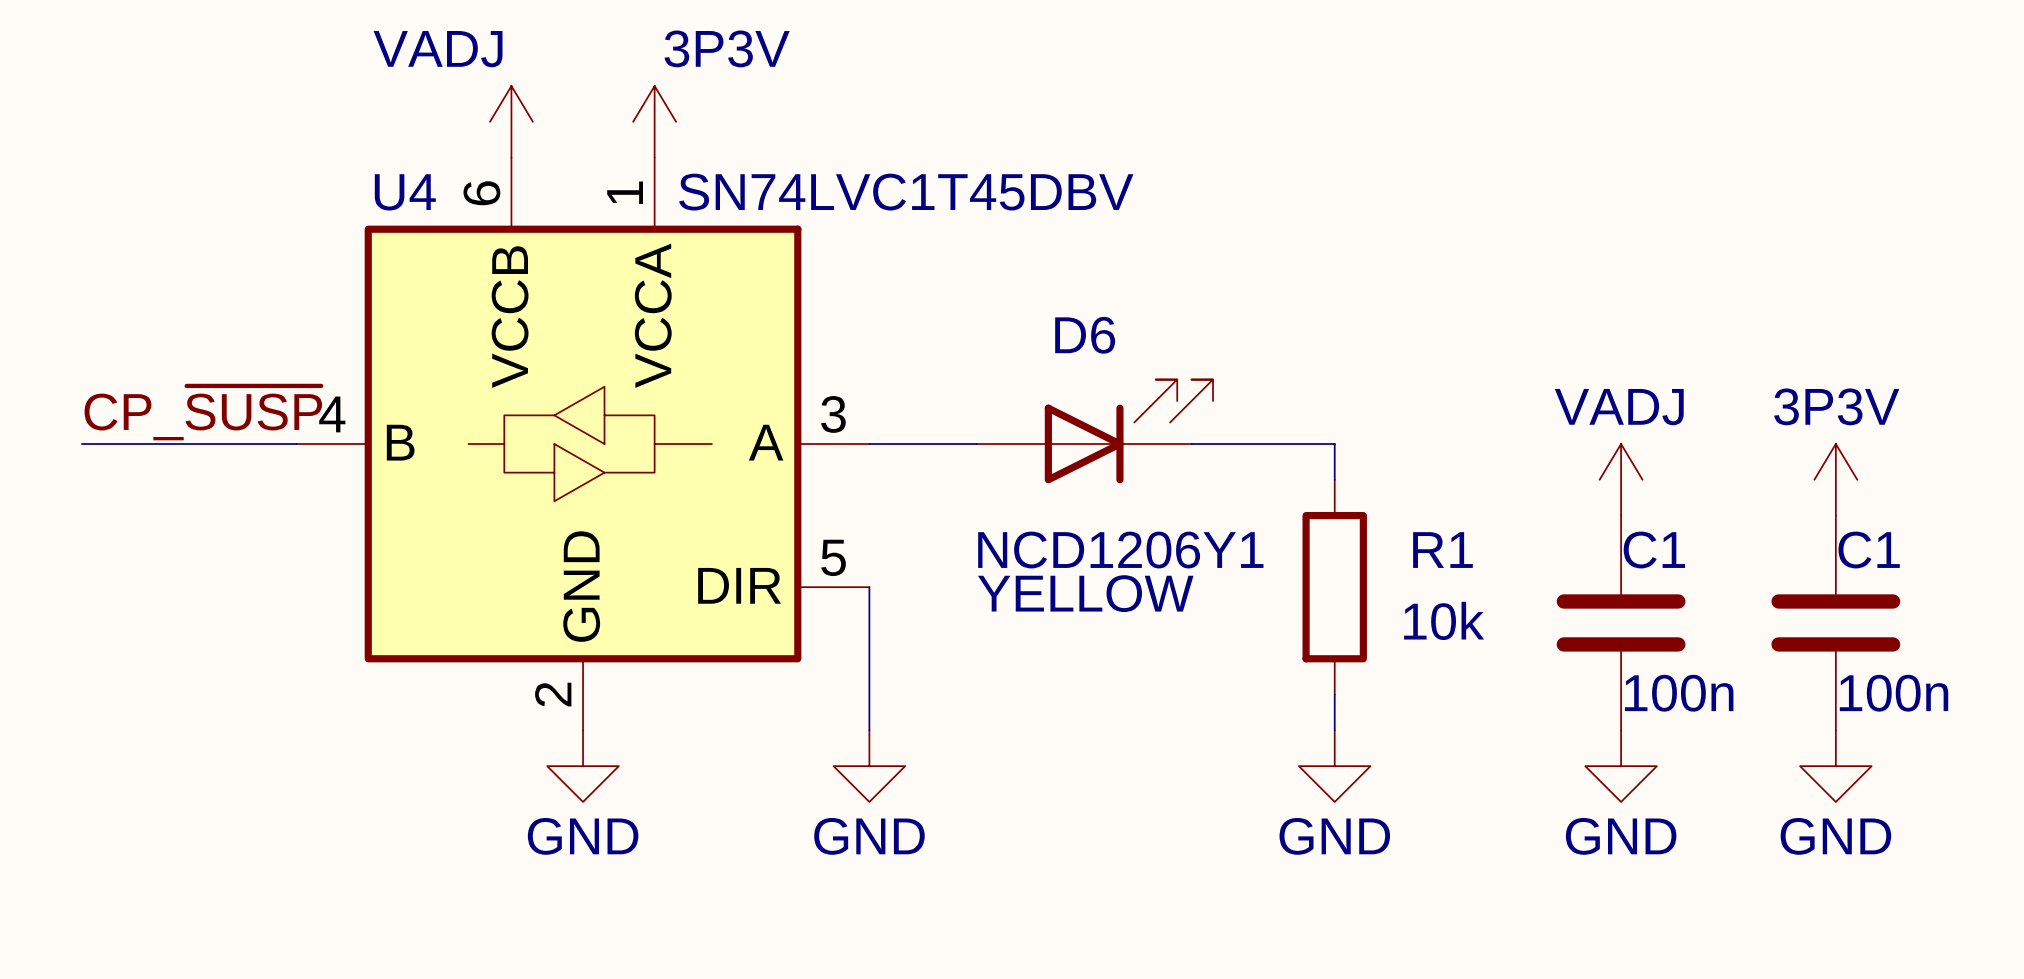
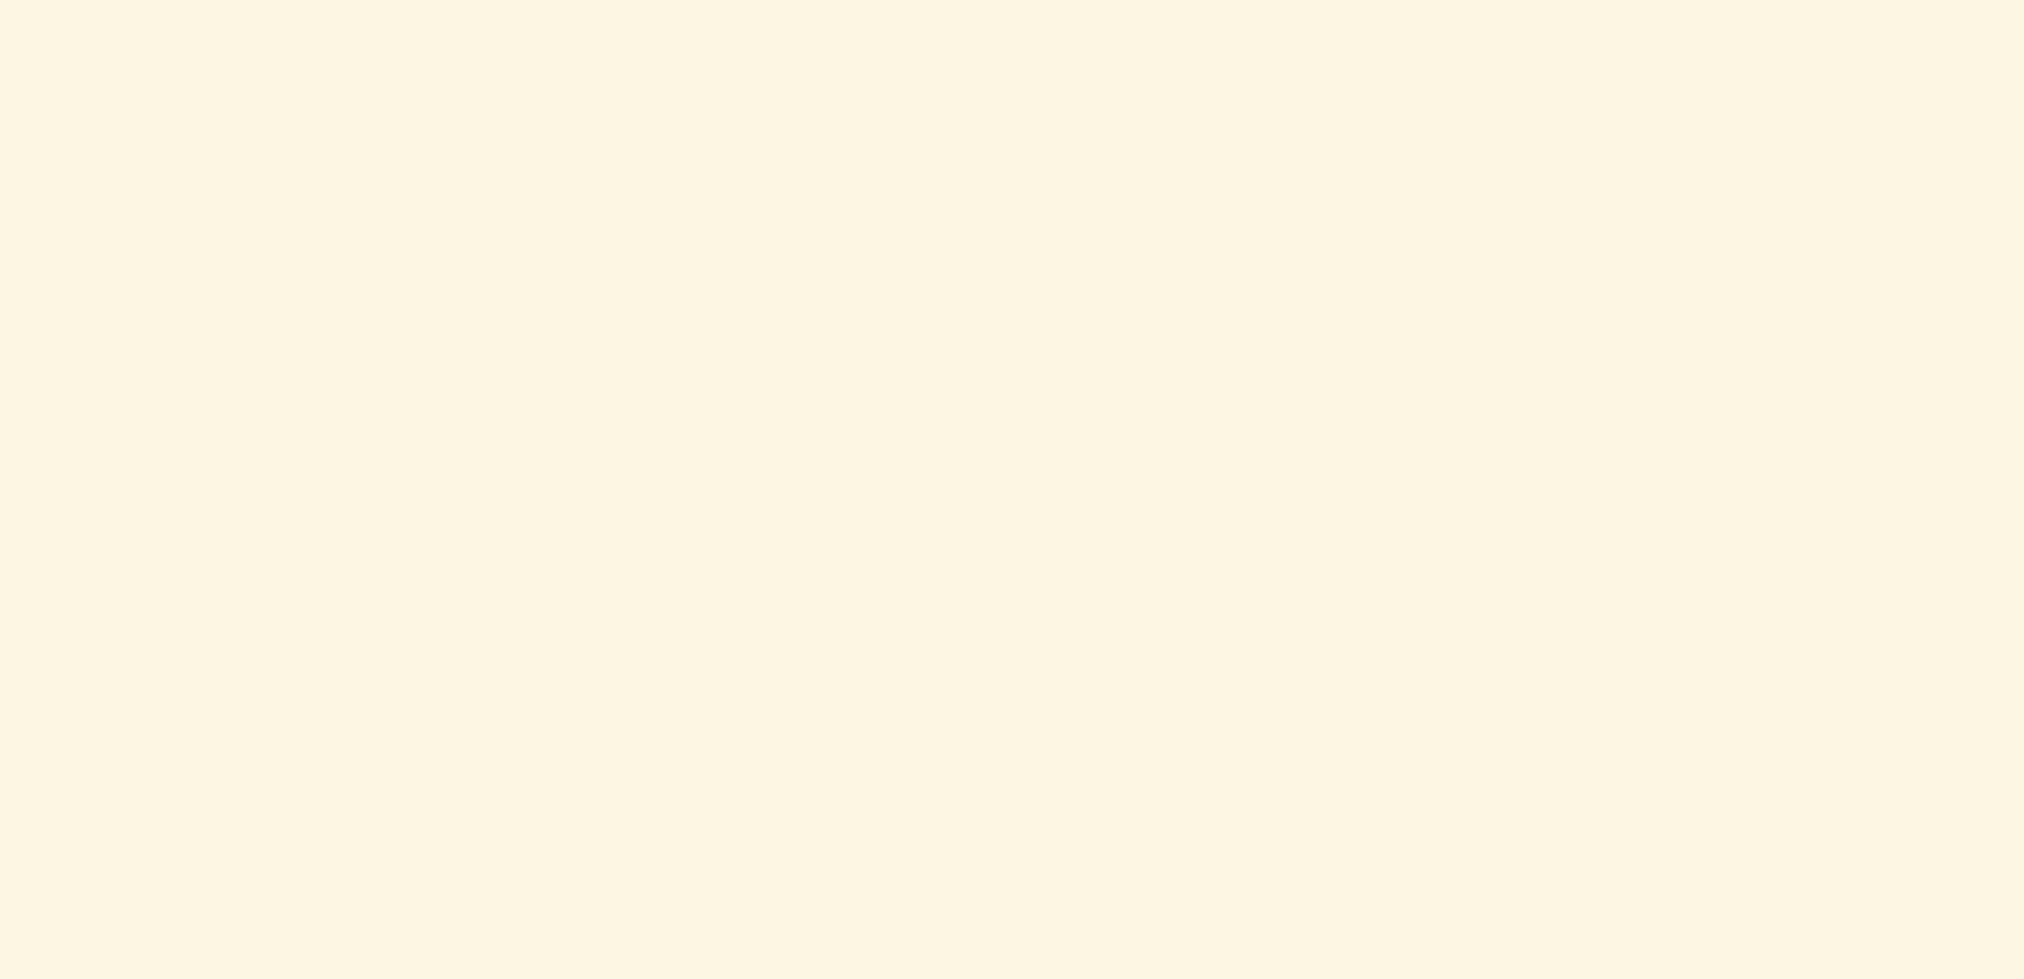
power symbol: VADJ (511, 121) -> none
power symbol: 3P3V (654, 121) -> none
label: CP_~{SUSP} (203, 413) -> none
D6: NCD1206Y1 (1094, 431) -> none
wire: (81, 443) (296, 443) -> none
U4: SN74LVC1T45DBV (583, 443) -> none
wire: (869, 443) (976, 443) -> none
wire: (1191, 443) (1334, 443) (1334, 479) -> none
power symbol: VADJ (1621, 479) -> none
power symbol: 3P3V (1835, 479) -> none
wire: (869, 587) (869, 730) -> none
R1: 10k (1334, 587) -> none
text: YELLOW (1085, 593) -> none
C1: 100n (1621, 622) -> none
C1: 100n (1835, 622) -> none
wire: (1334, 694) (1334, 730) -> none
power symbol: GND (583, 766) -> none
power symbol: GND (869, 766) -> none
power symbol: GND (1334, 766) -> none
power symbol: GND (1621, 766) -> none
power symbol: GND (1835, 766) -> none

